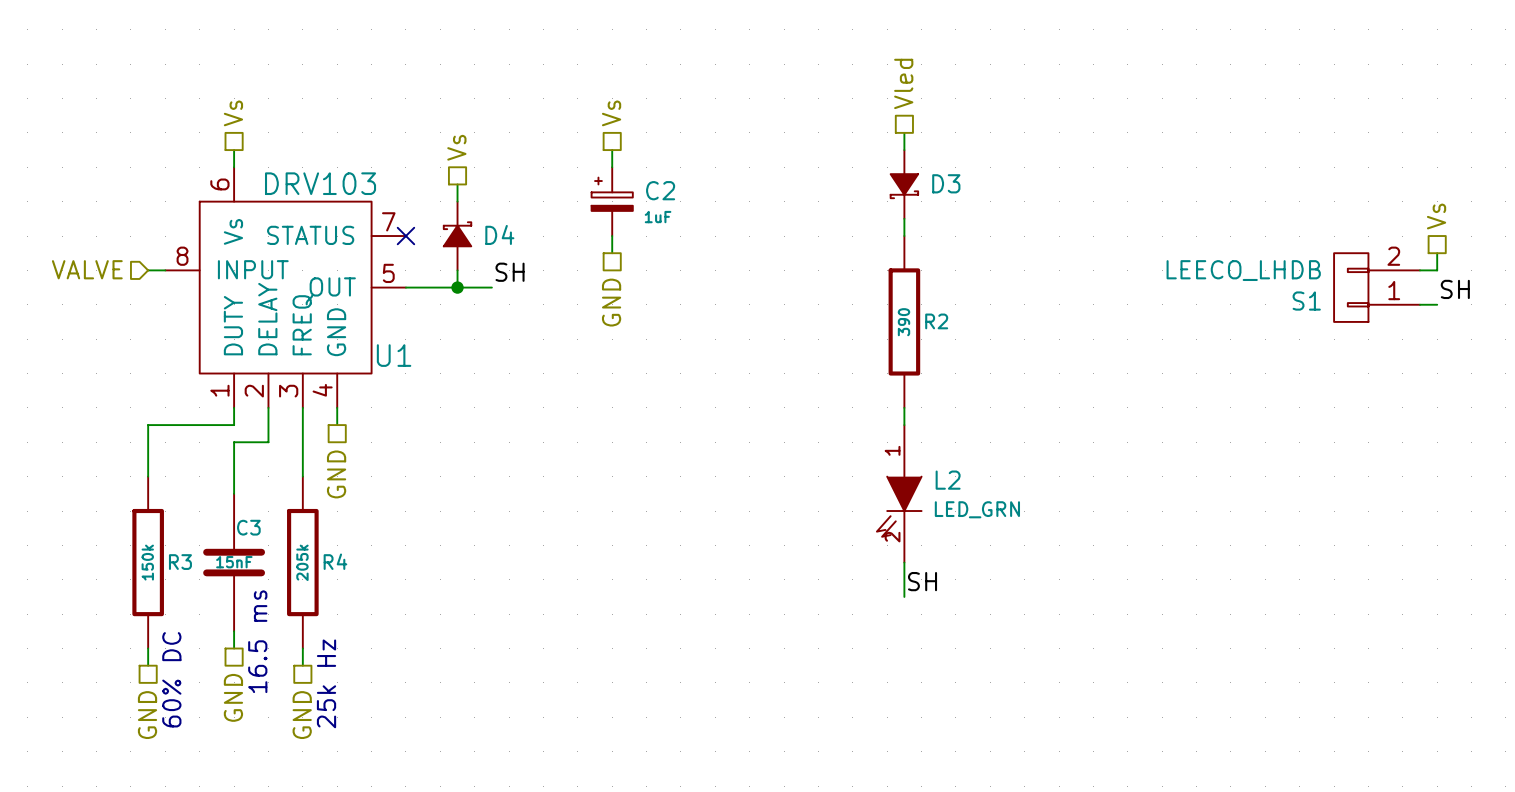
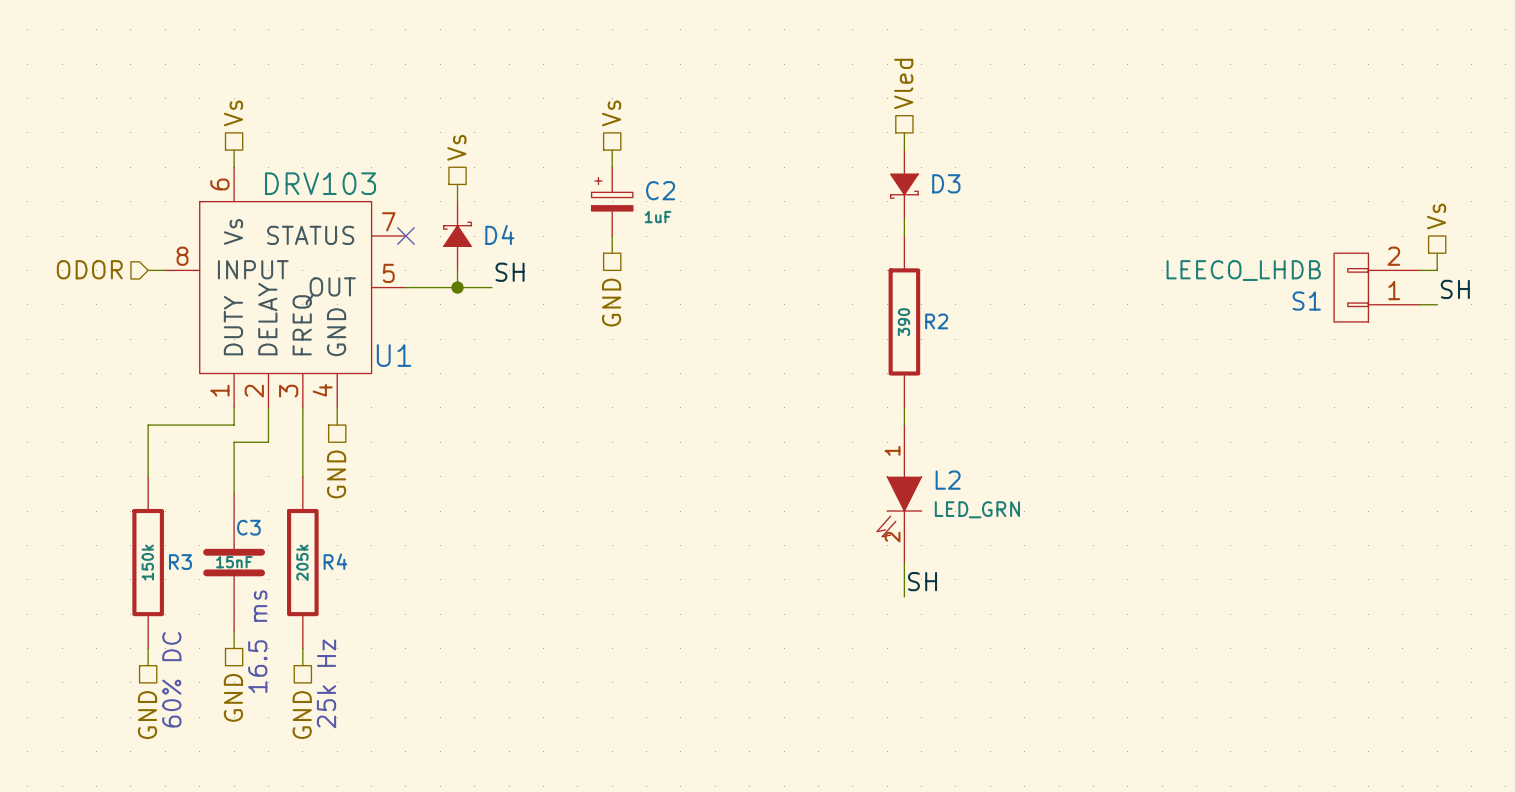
hierarchical label: VALVE (87, 269) -> ODOR (89, 269)

